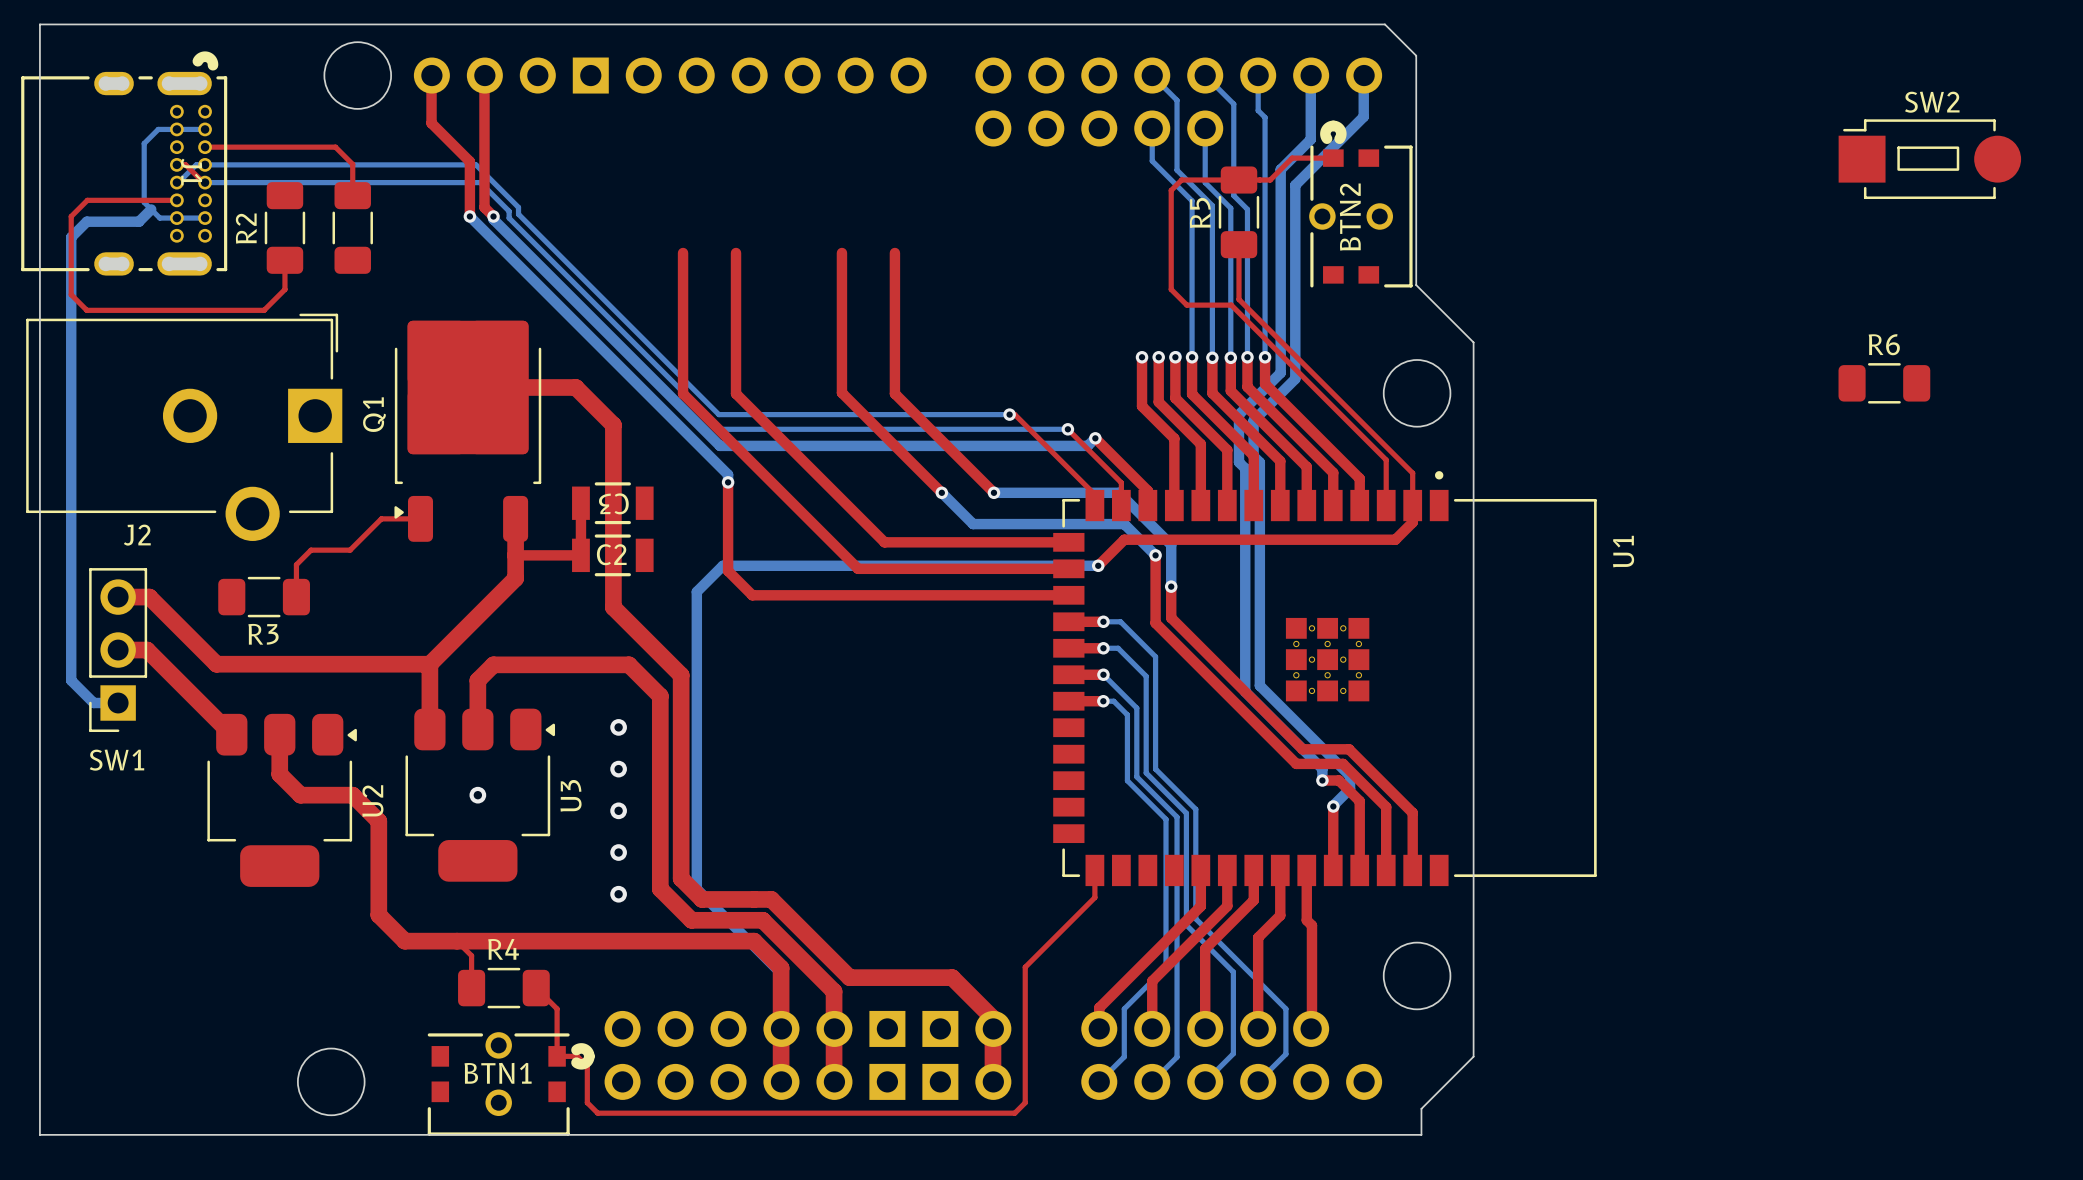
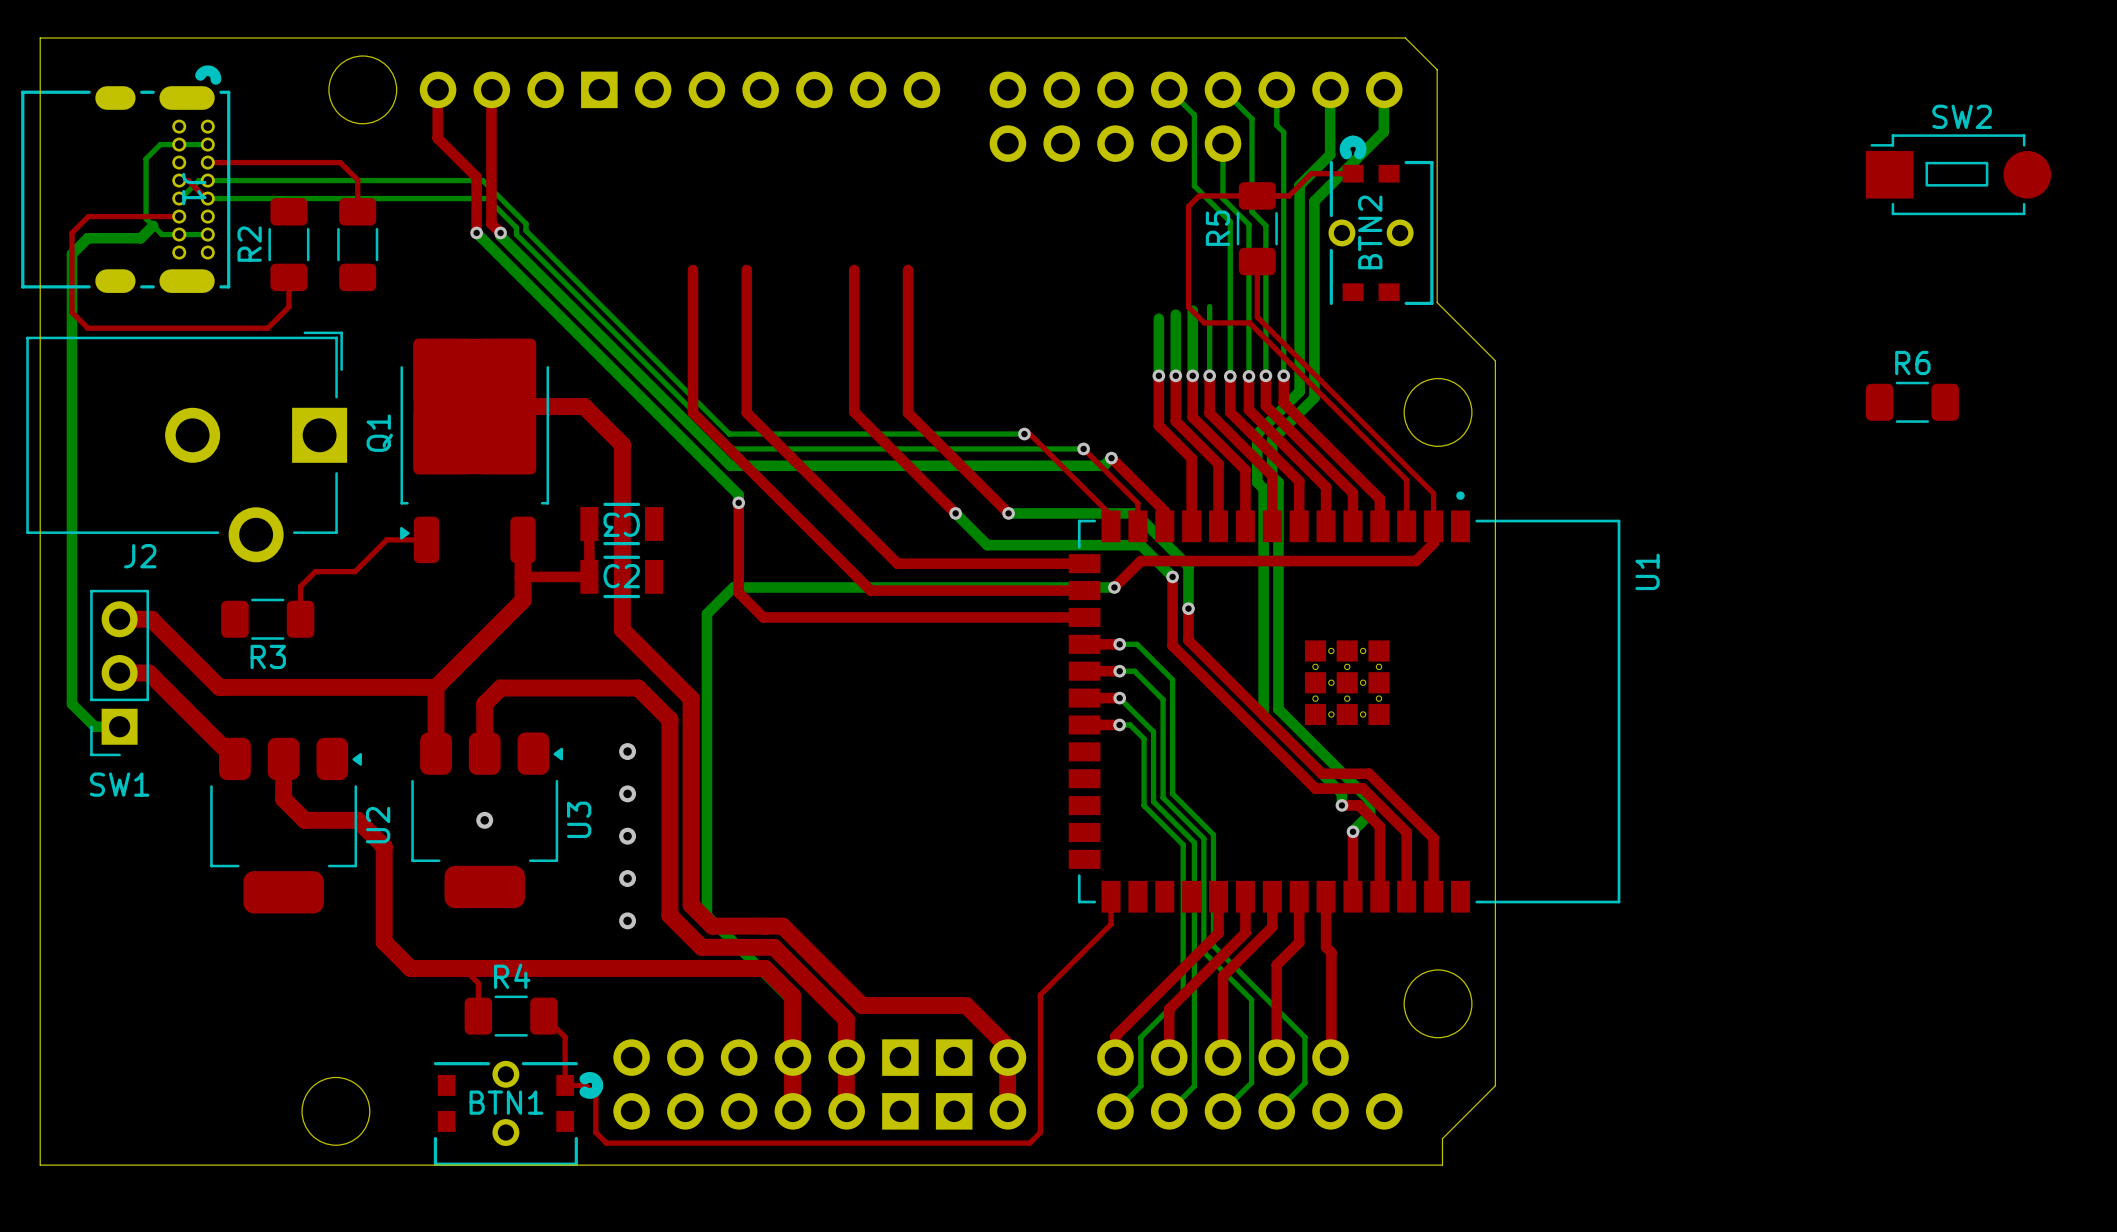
bottom track: (1152, 128) (1152, 161) (1192, 200) (1192, 289) -> none
bottom track: none -> (1192, 310) (1192, 375)
bottom track: none -> (1175, 314) (1175, 375)
bottom track: none -> (1158, 318) (1158, 375)

